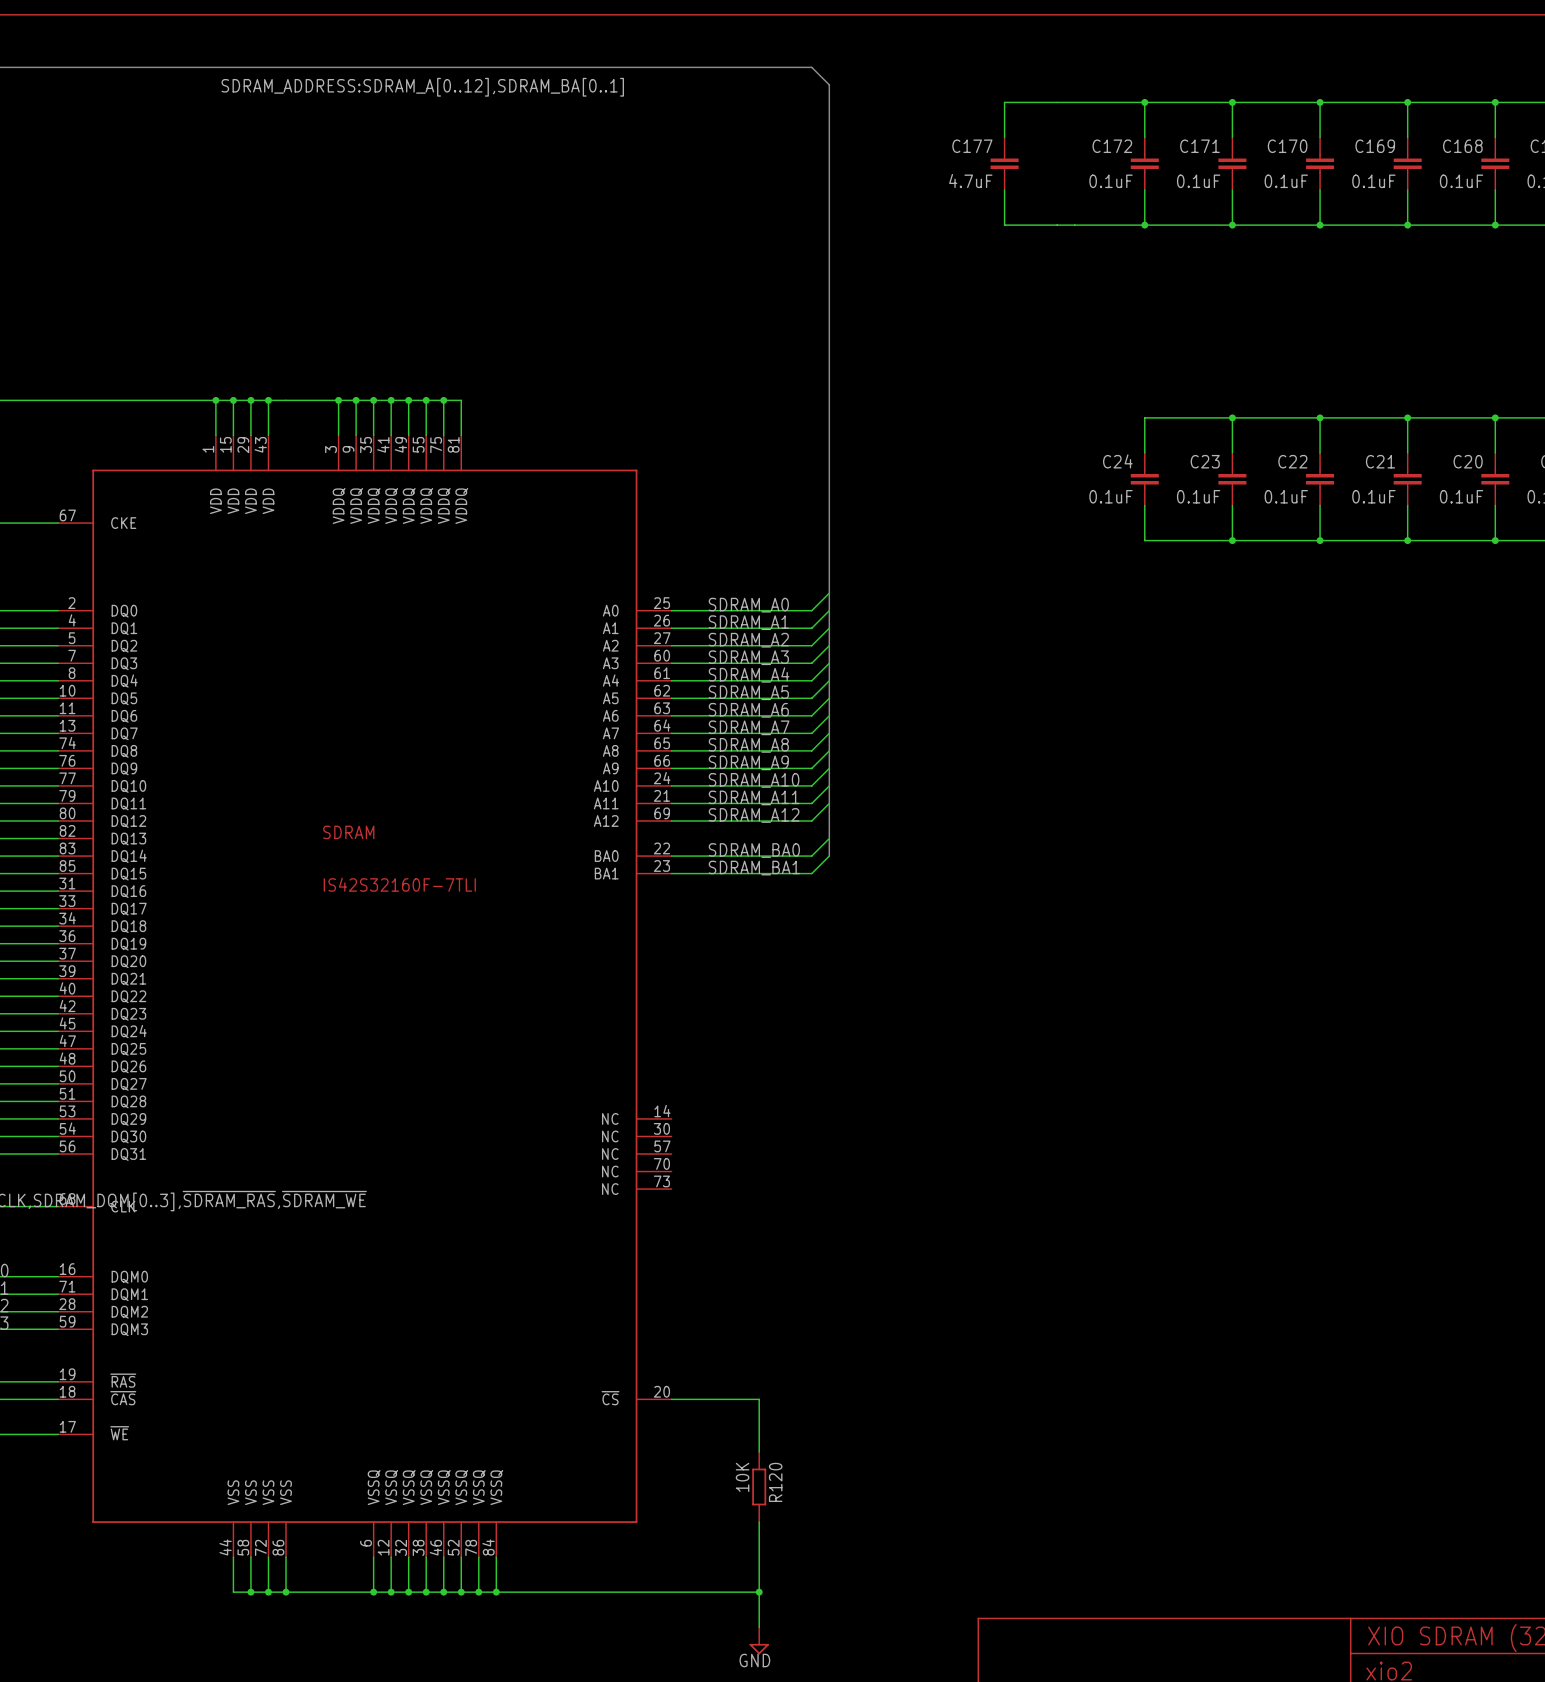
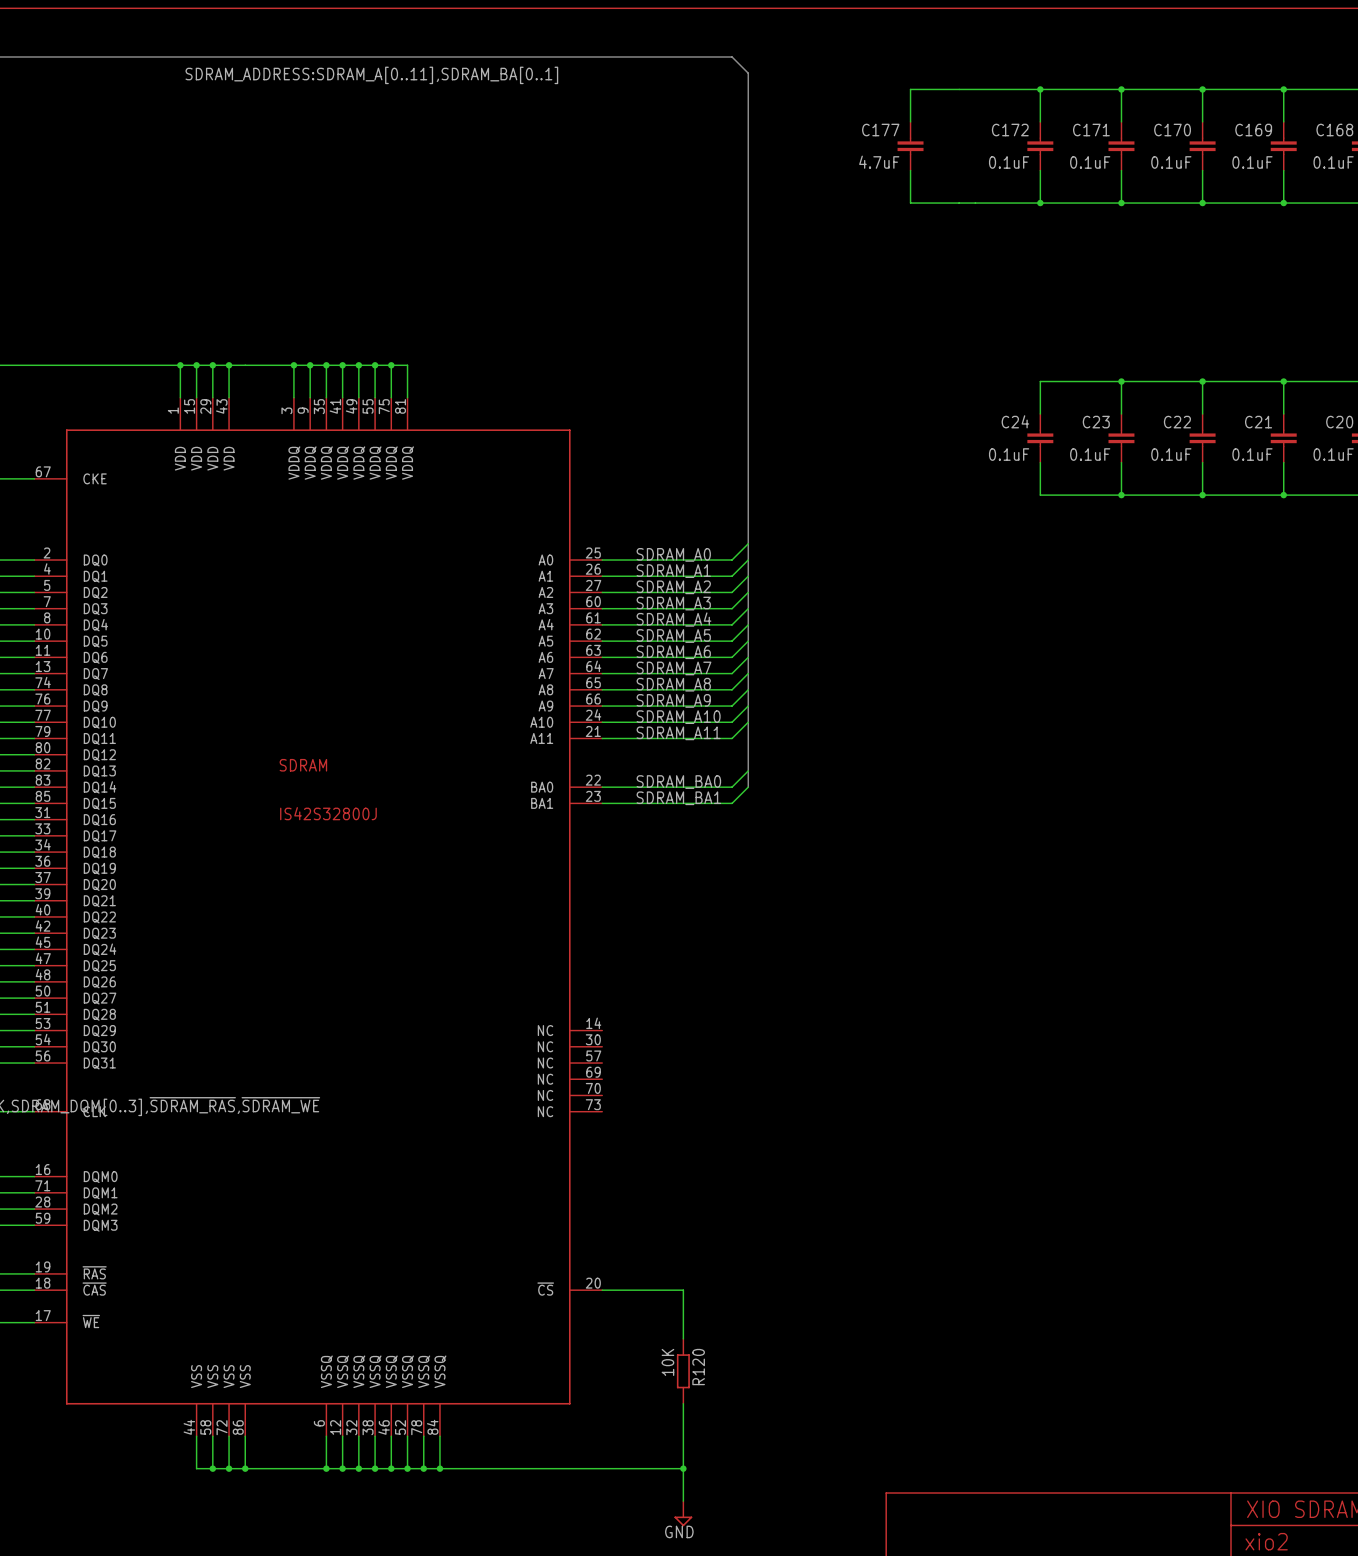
label: SDRAM_ADDRESS:SDRAM_A[0..12],SDRAM_BA[0..1] (422, 87) -> SDRAM_ADDRESS:SDRAM_A[0..11],SDRAM_BA[0..1] (371, 75)
SDRAM symbol: [58, 435, 672, 1558] -> [34, 397, 603, 1437]
wire: (829, 803) (811, 821) (671, 821) -> none
label: SDRAM_A12 (754, 815) -> none
SDRAM value: IS42S32160F-7TLI (399, 884) -> IS42S32800J (328, 813)

